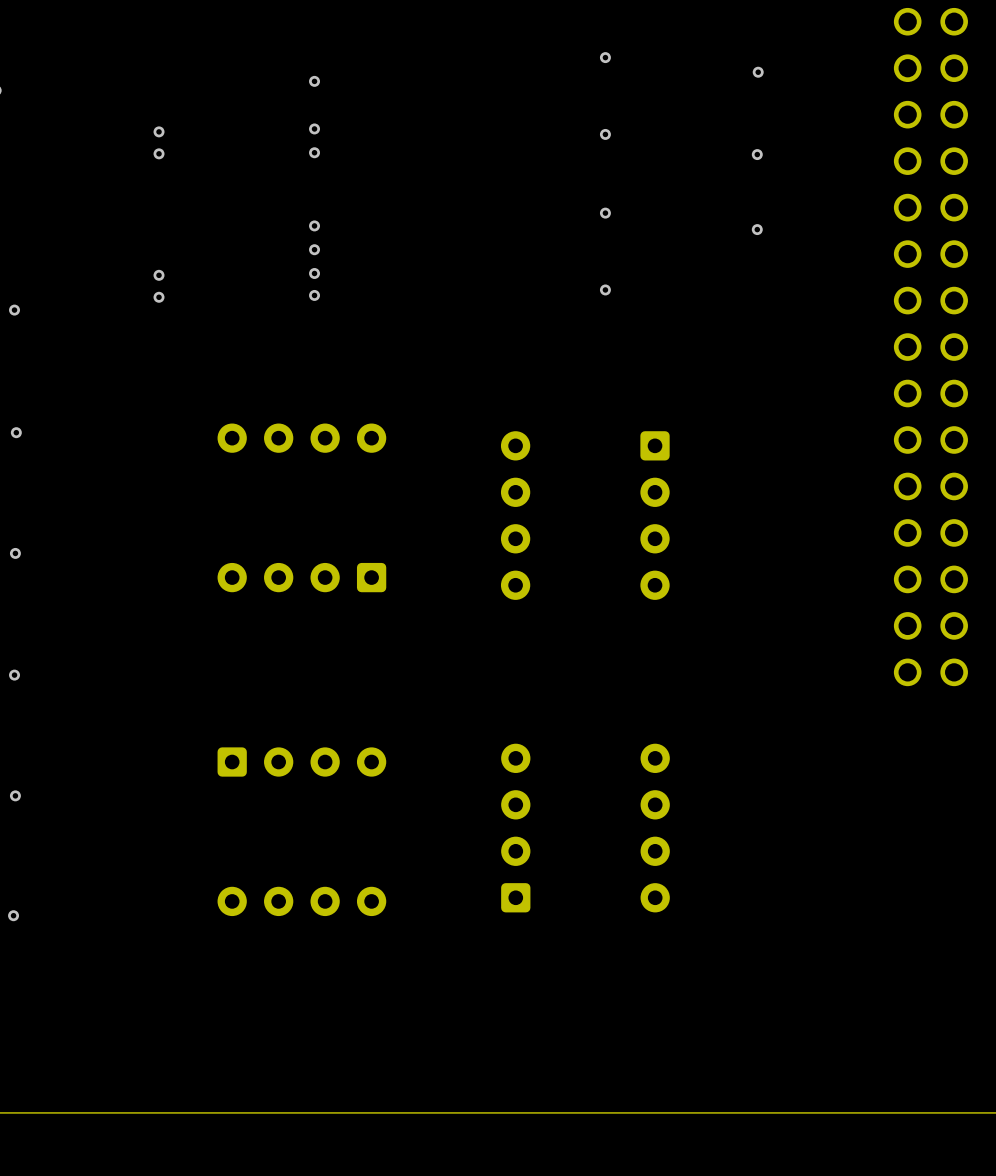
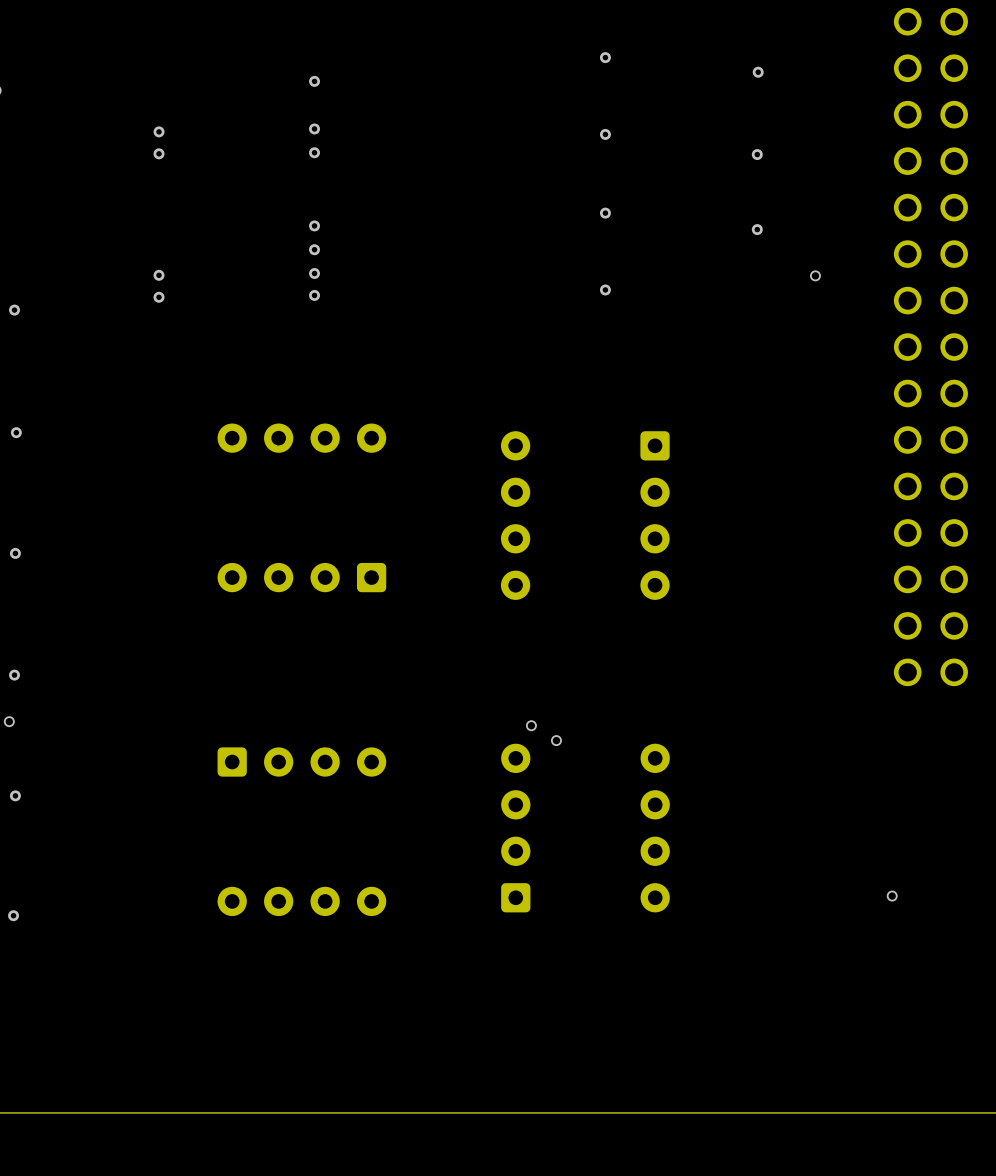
via: none -> (815, 275)
via: none -> (9, 721)
via: none -> (531, 725)
via: none -> (556, 740)
via: none -> (892, 896)

